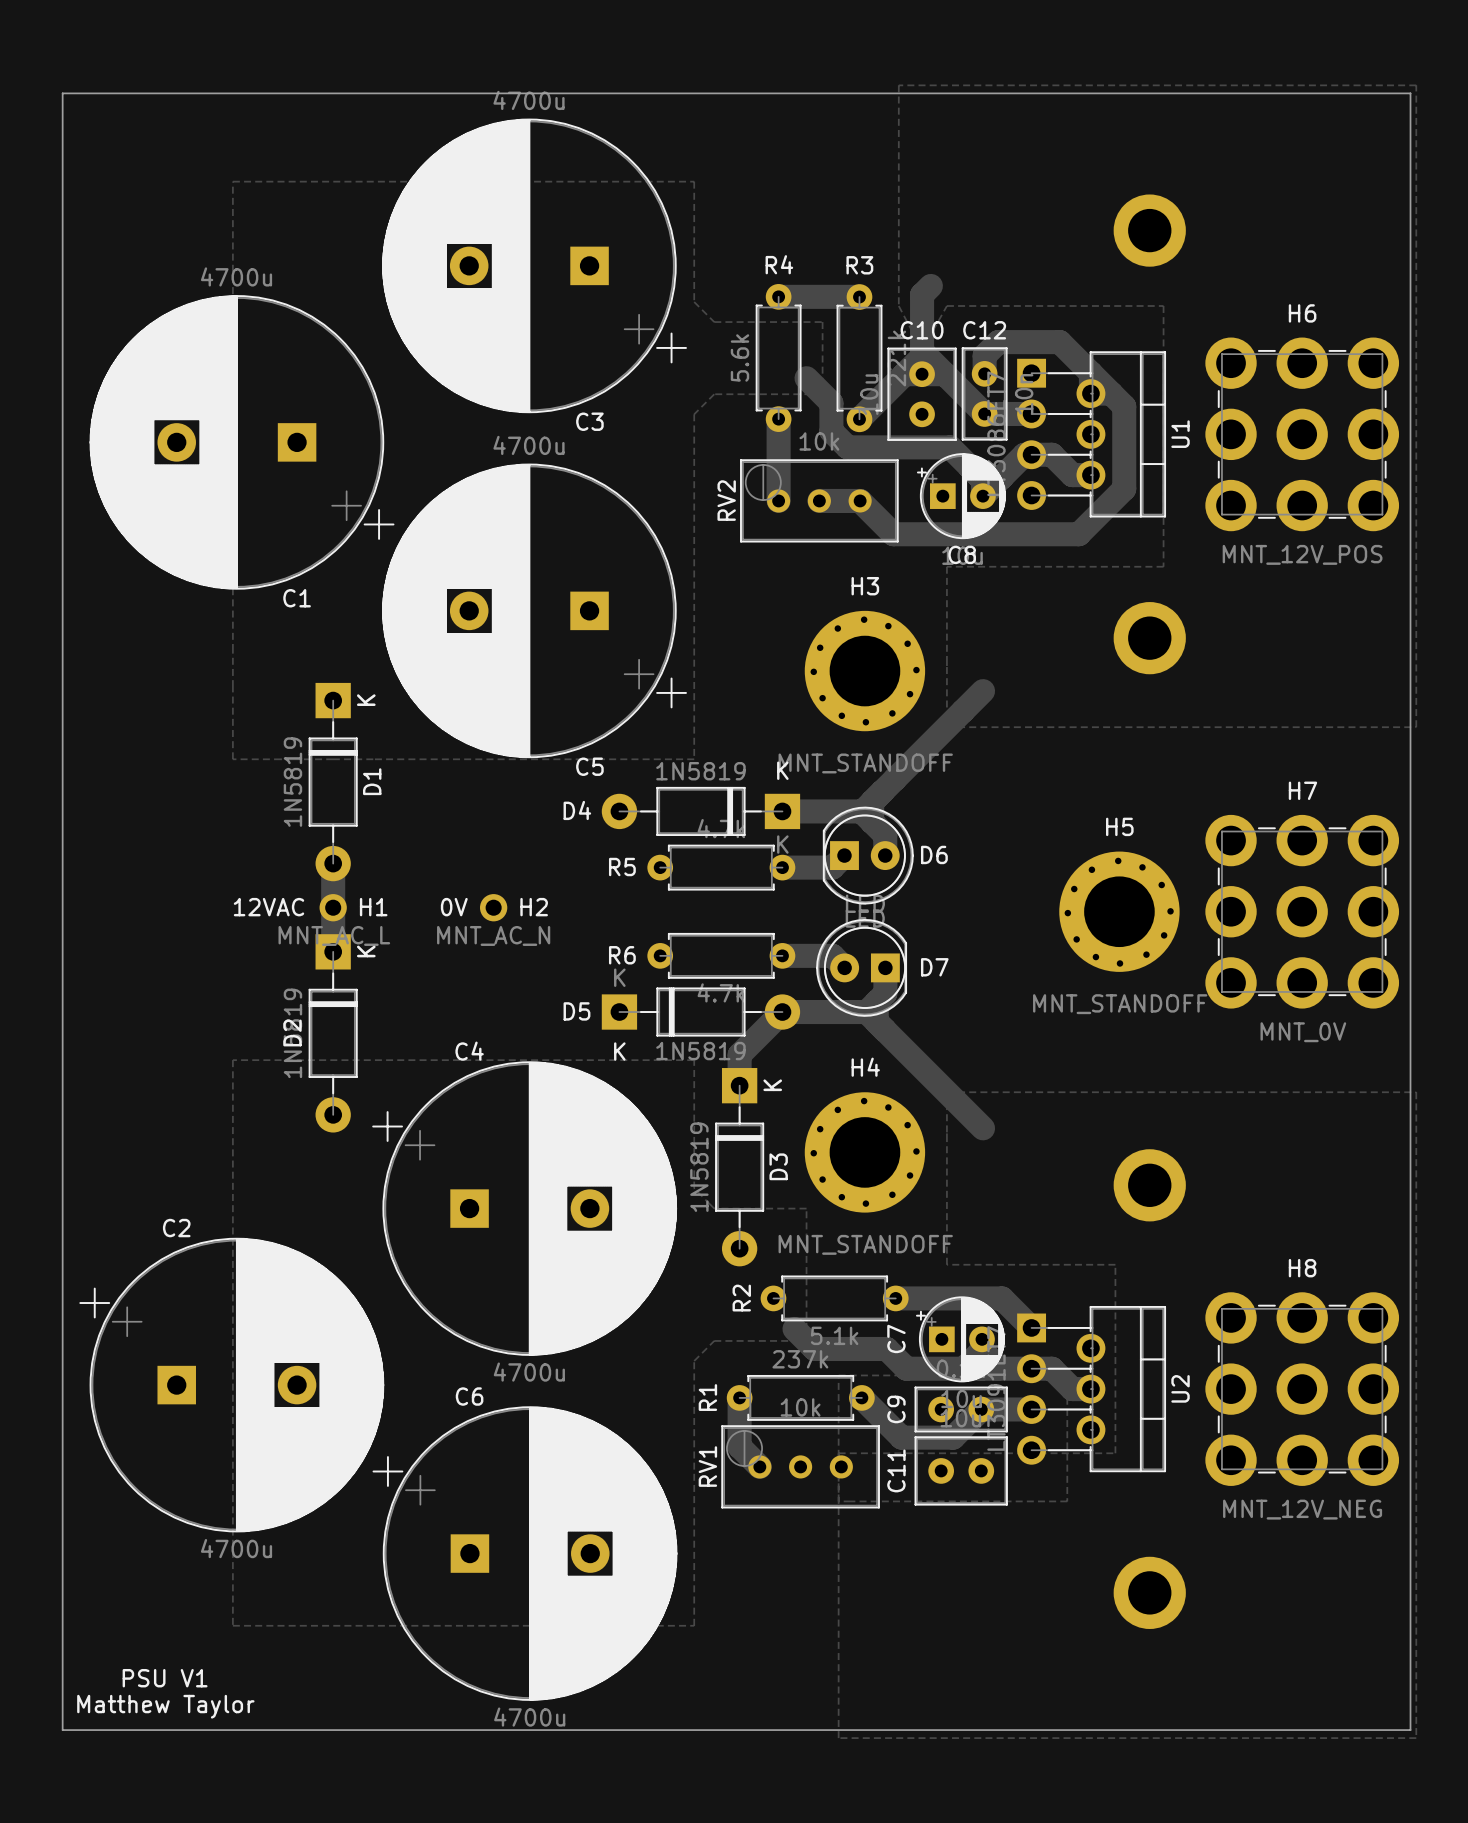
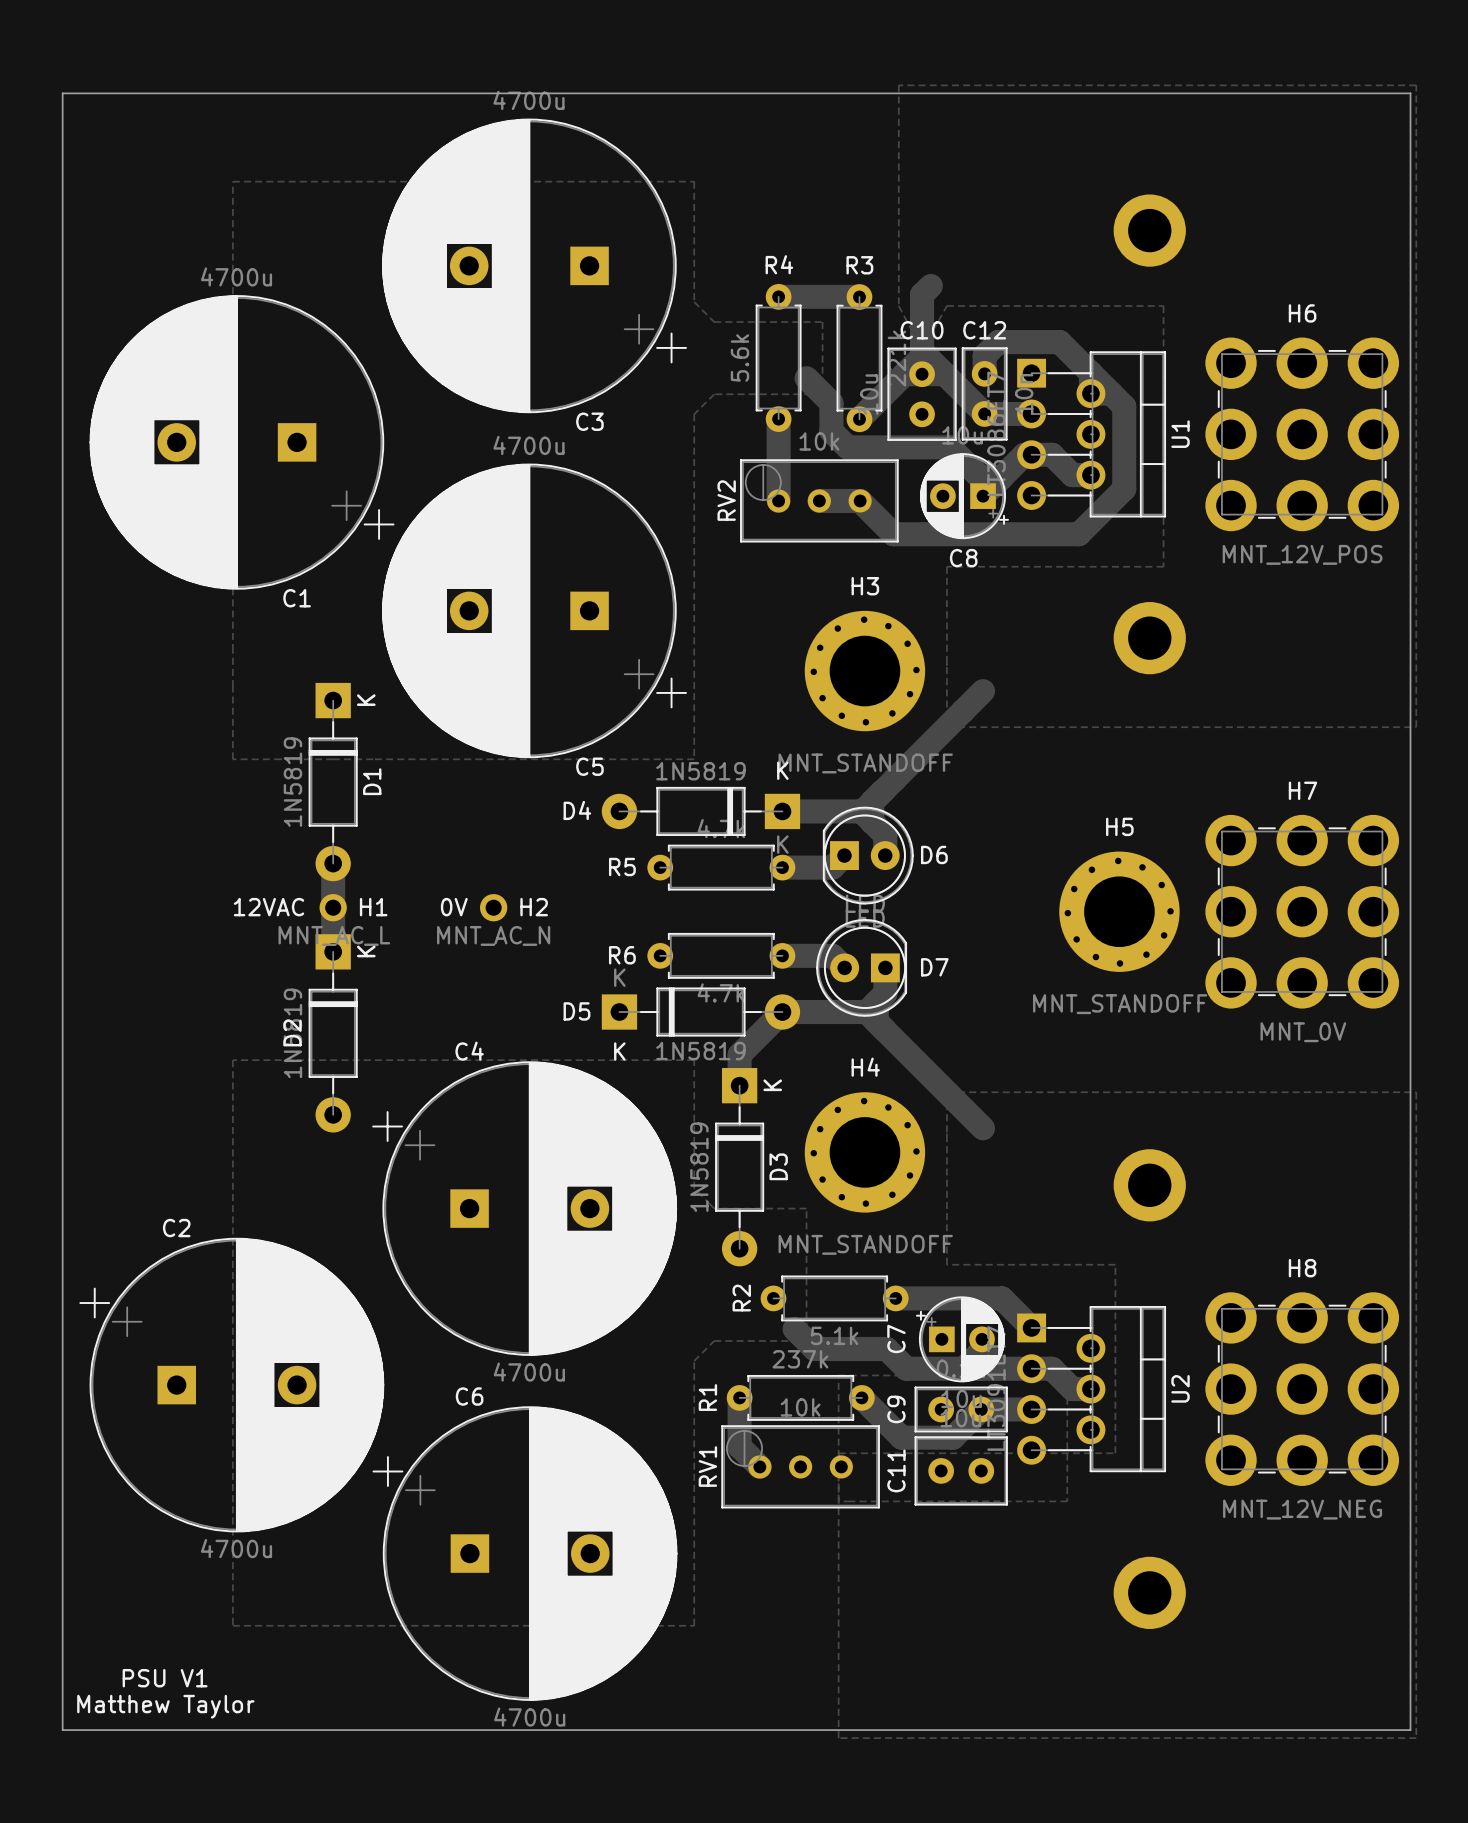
C8 rotation: 0° (961, 496) -> 180° (964, 496)

